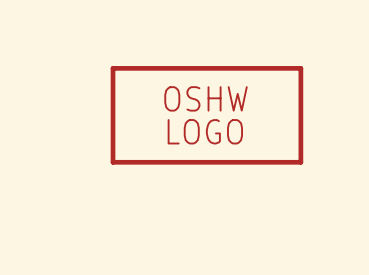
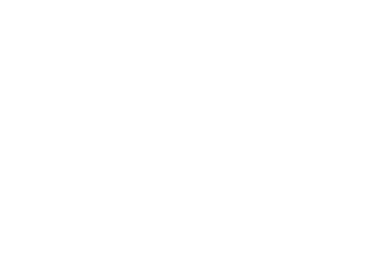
part: (206, 115) -> none

